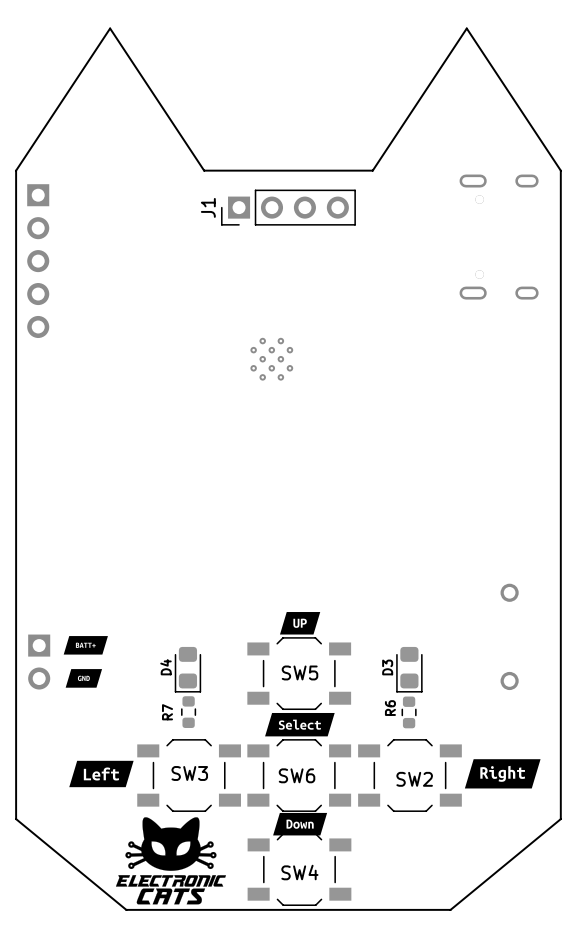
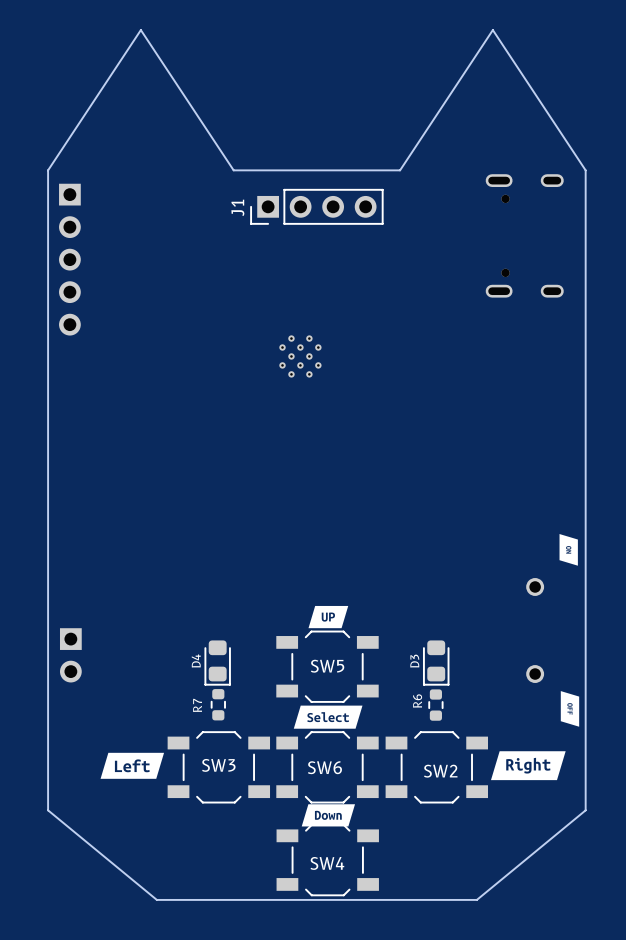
drawing: none -> [559, 534, 578, 566]
drawing: [63, 636, 108, 688] -> none
drawing: none -> [560, 691, 580, 727]
drawing: [115, 817, 226, 905] -> none

